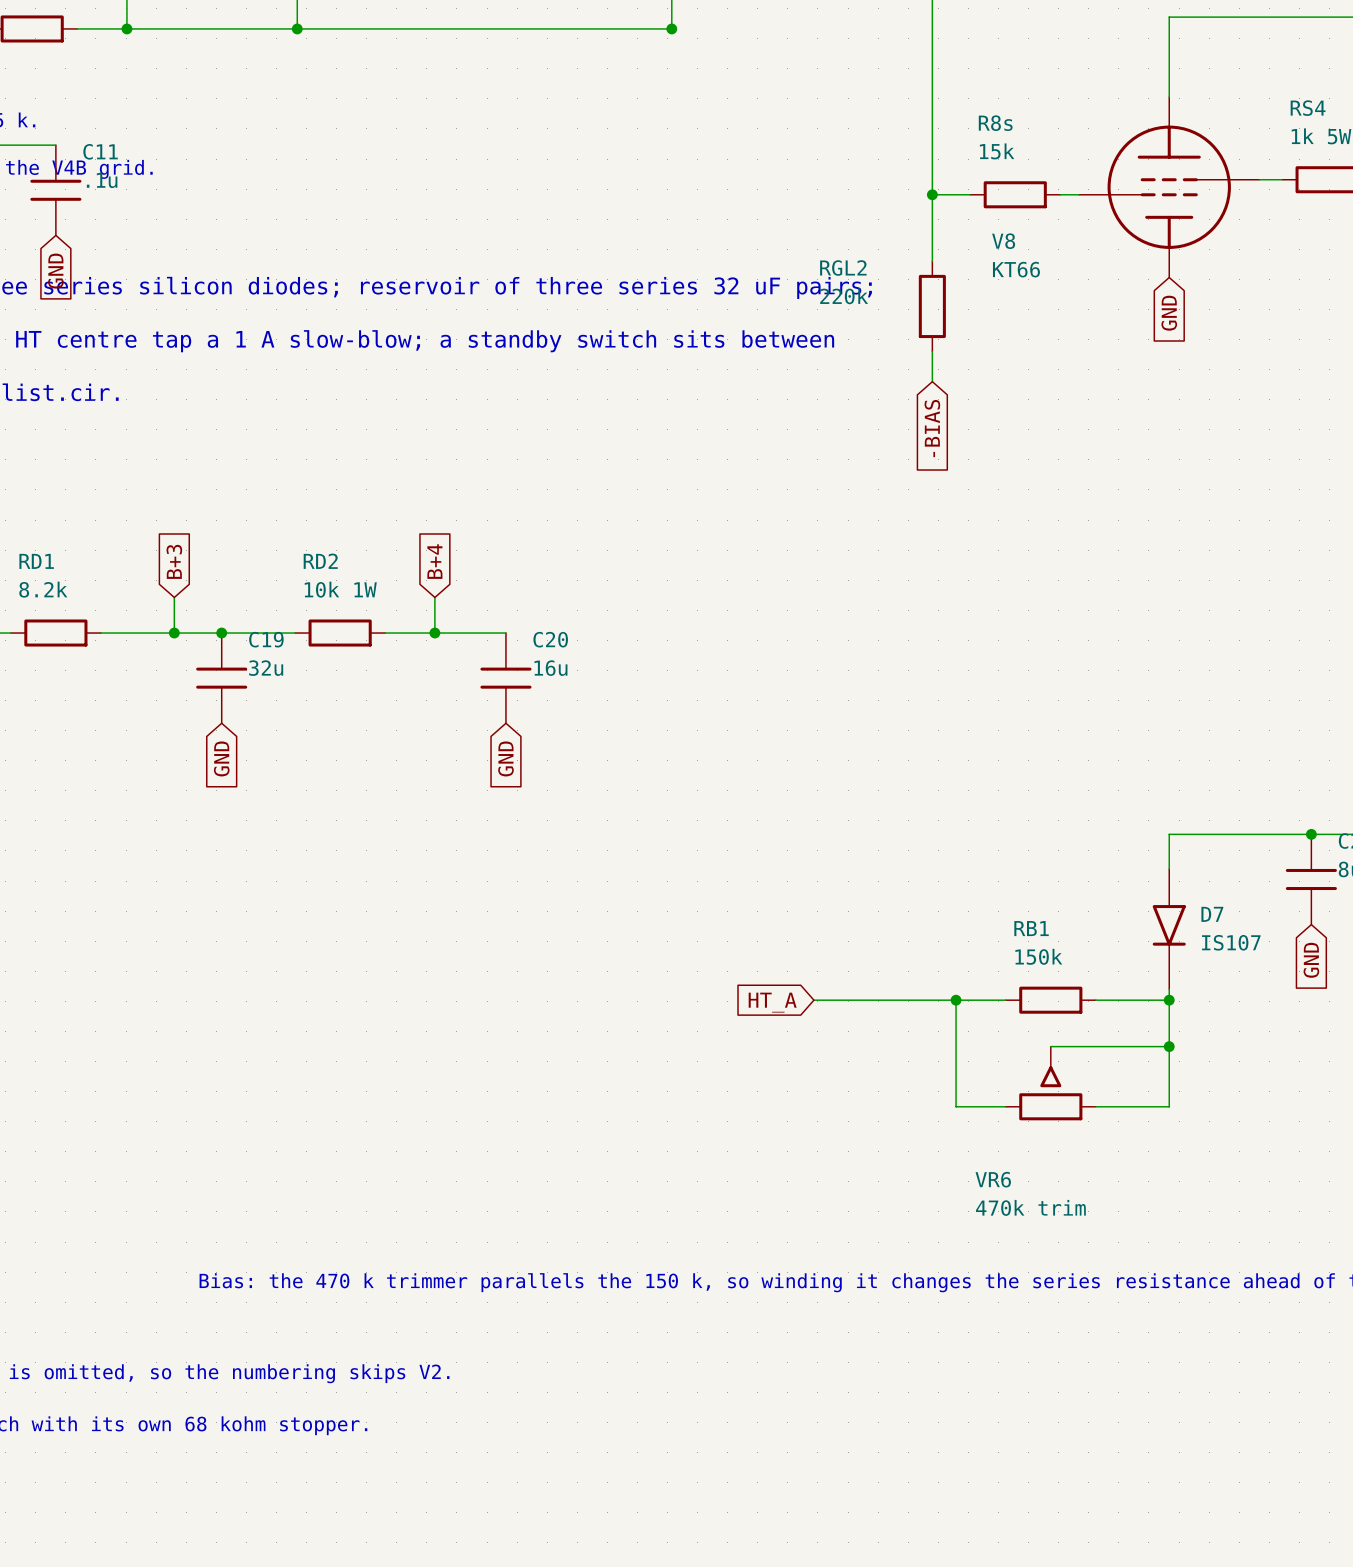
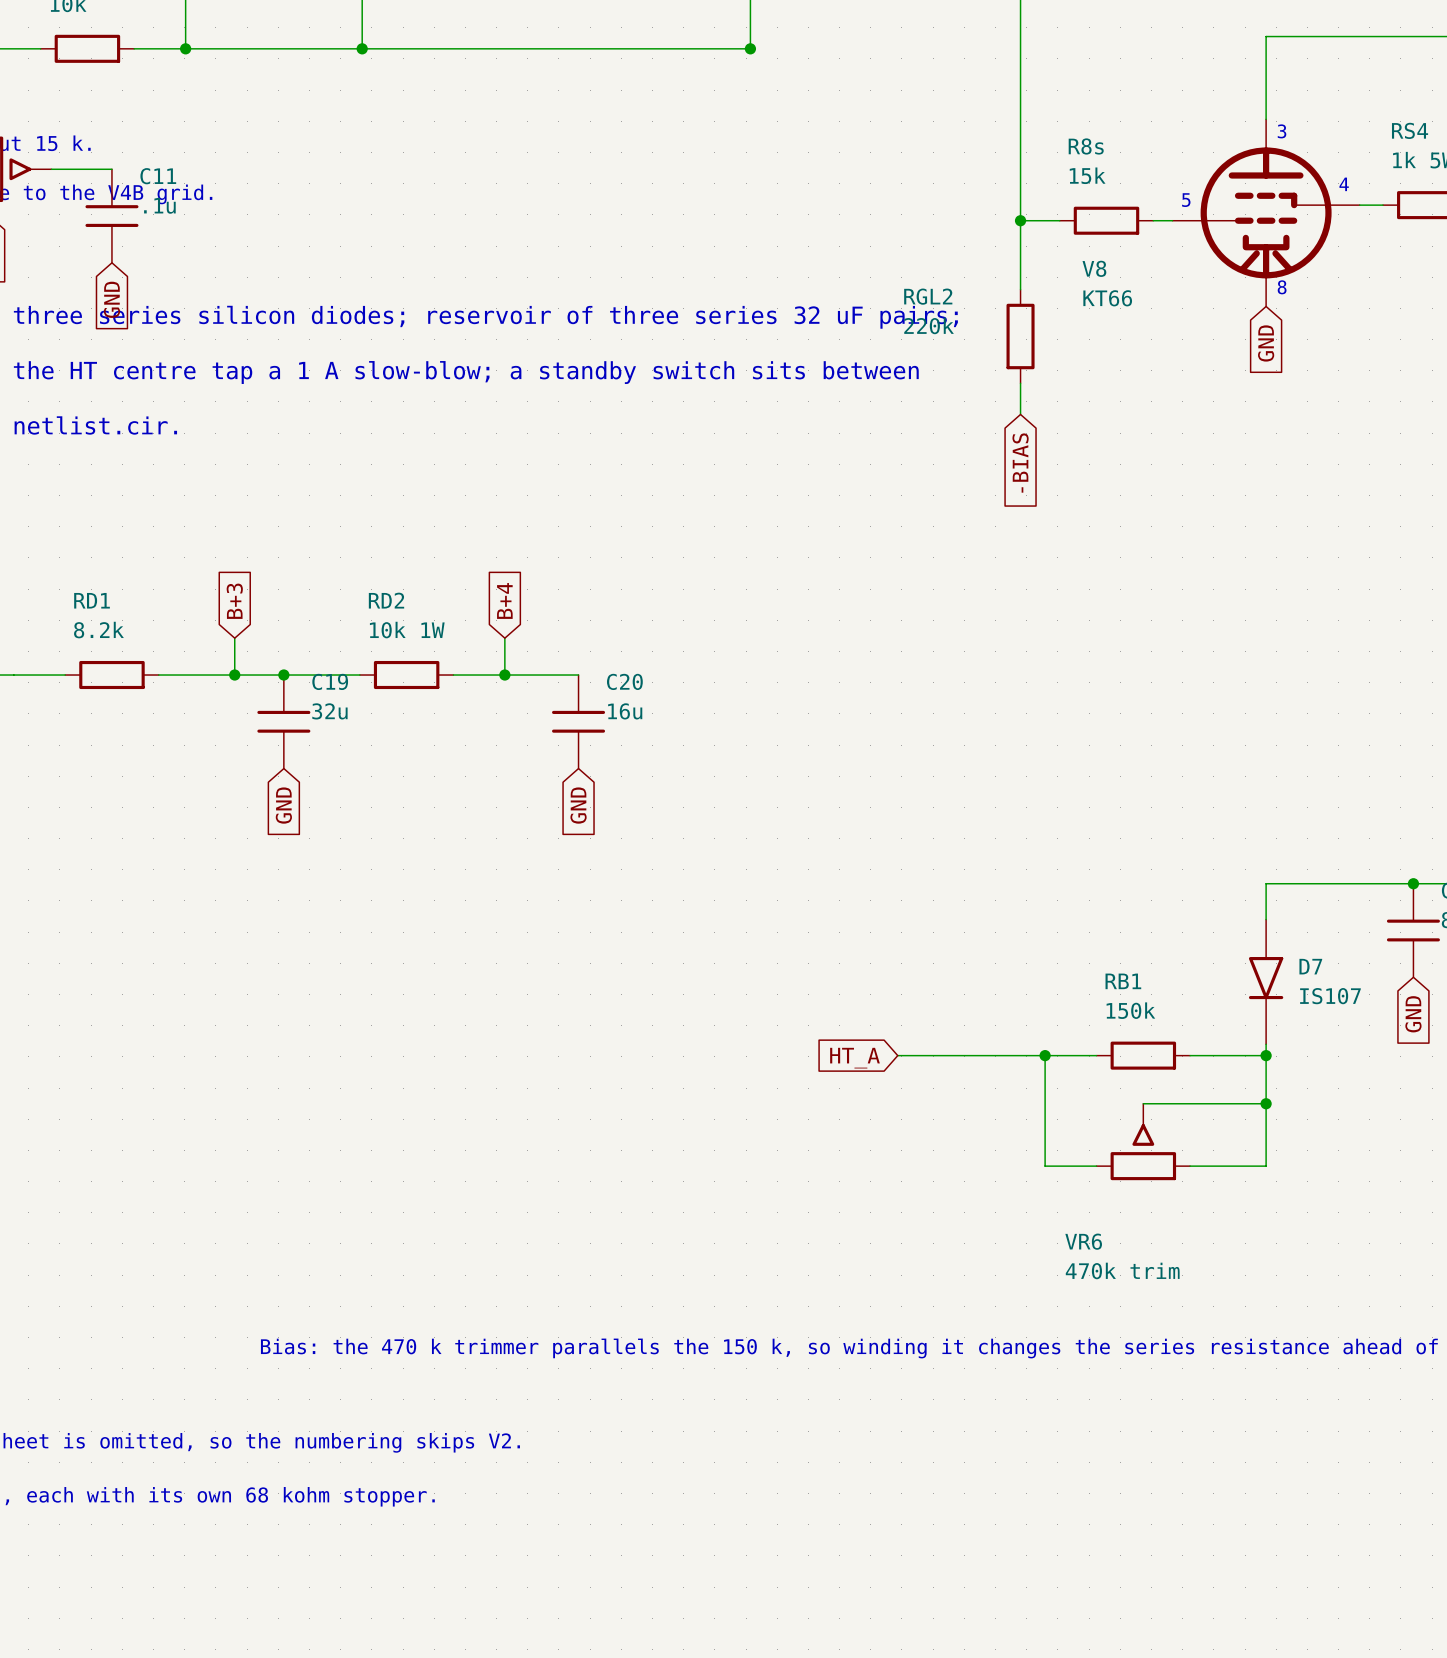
V8 symbol: [1078, 97, 1260, 278] -> [1172, 119, 1360, 307]
text: none -> 3 (1282, 131)
text: none -> 4 (1344, 184)
text: none -> 5 (1186, 200)
text: none -> 8 (1282, 287)

